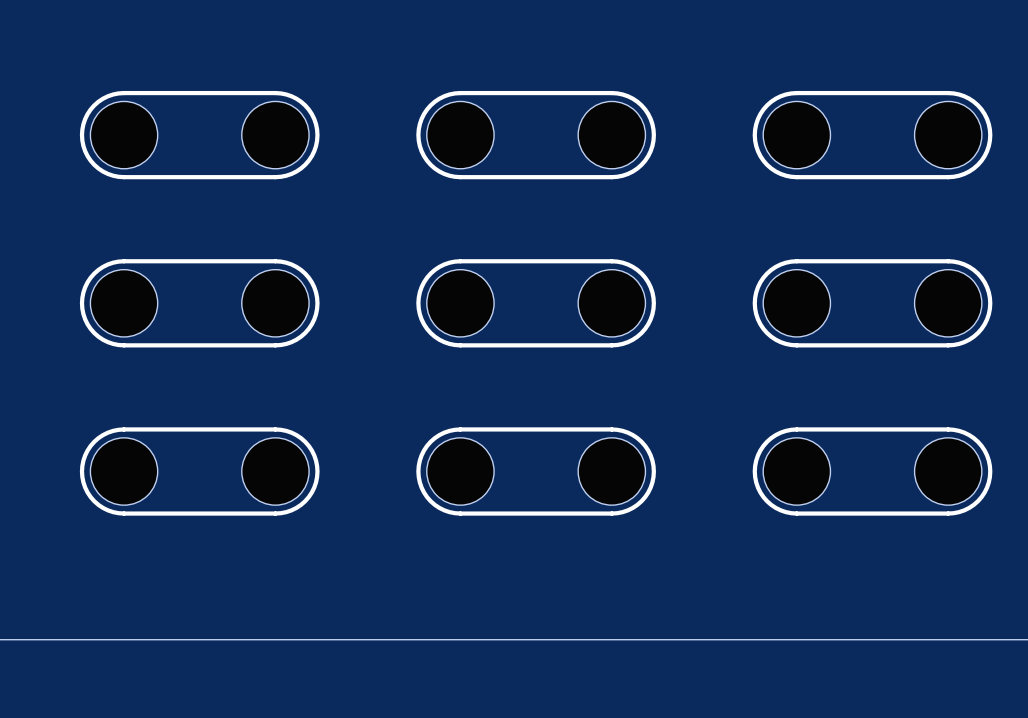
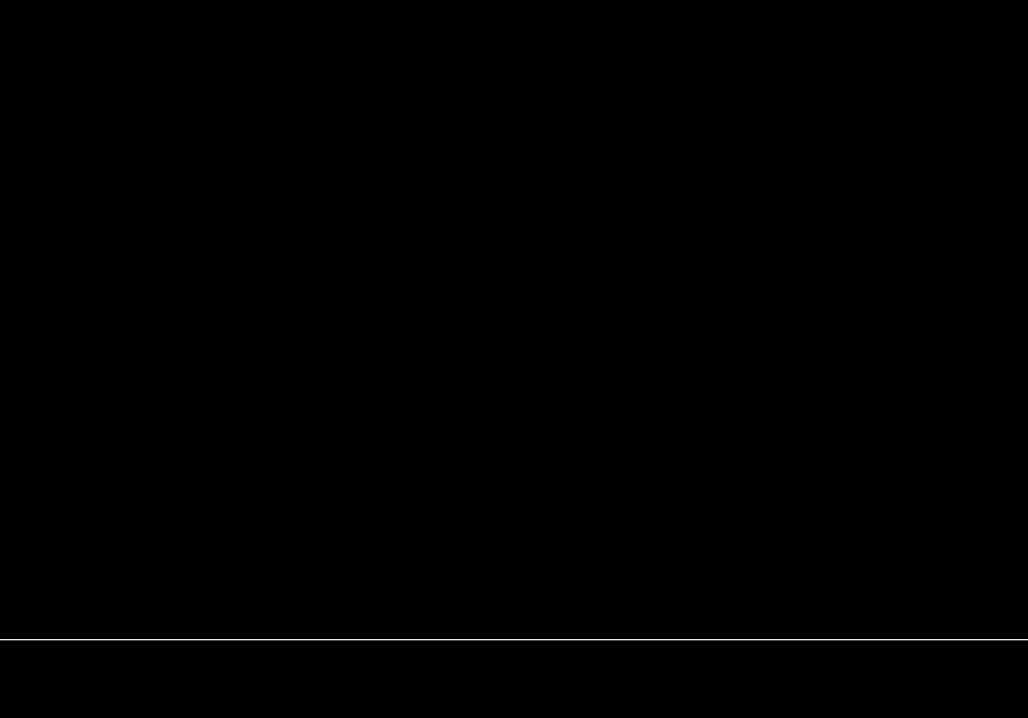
part: (199, 135) -> none
part: (536, 135) -> none
part: (872, 135) -> none
part: (199, 303) -> none
part: (536, 303) -> none
part: (872, 303) -> none
part: (199, 471) -> none
part: (536, 471) -> none
part: (872, 471) -> none

